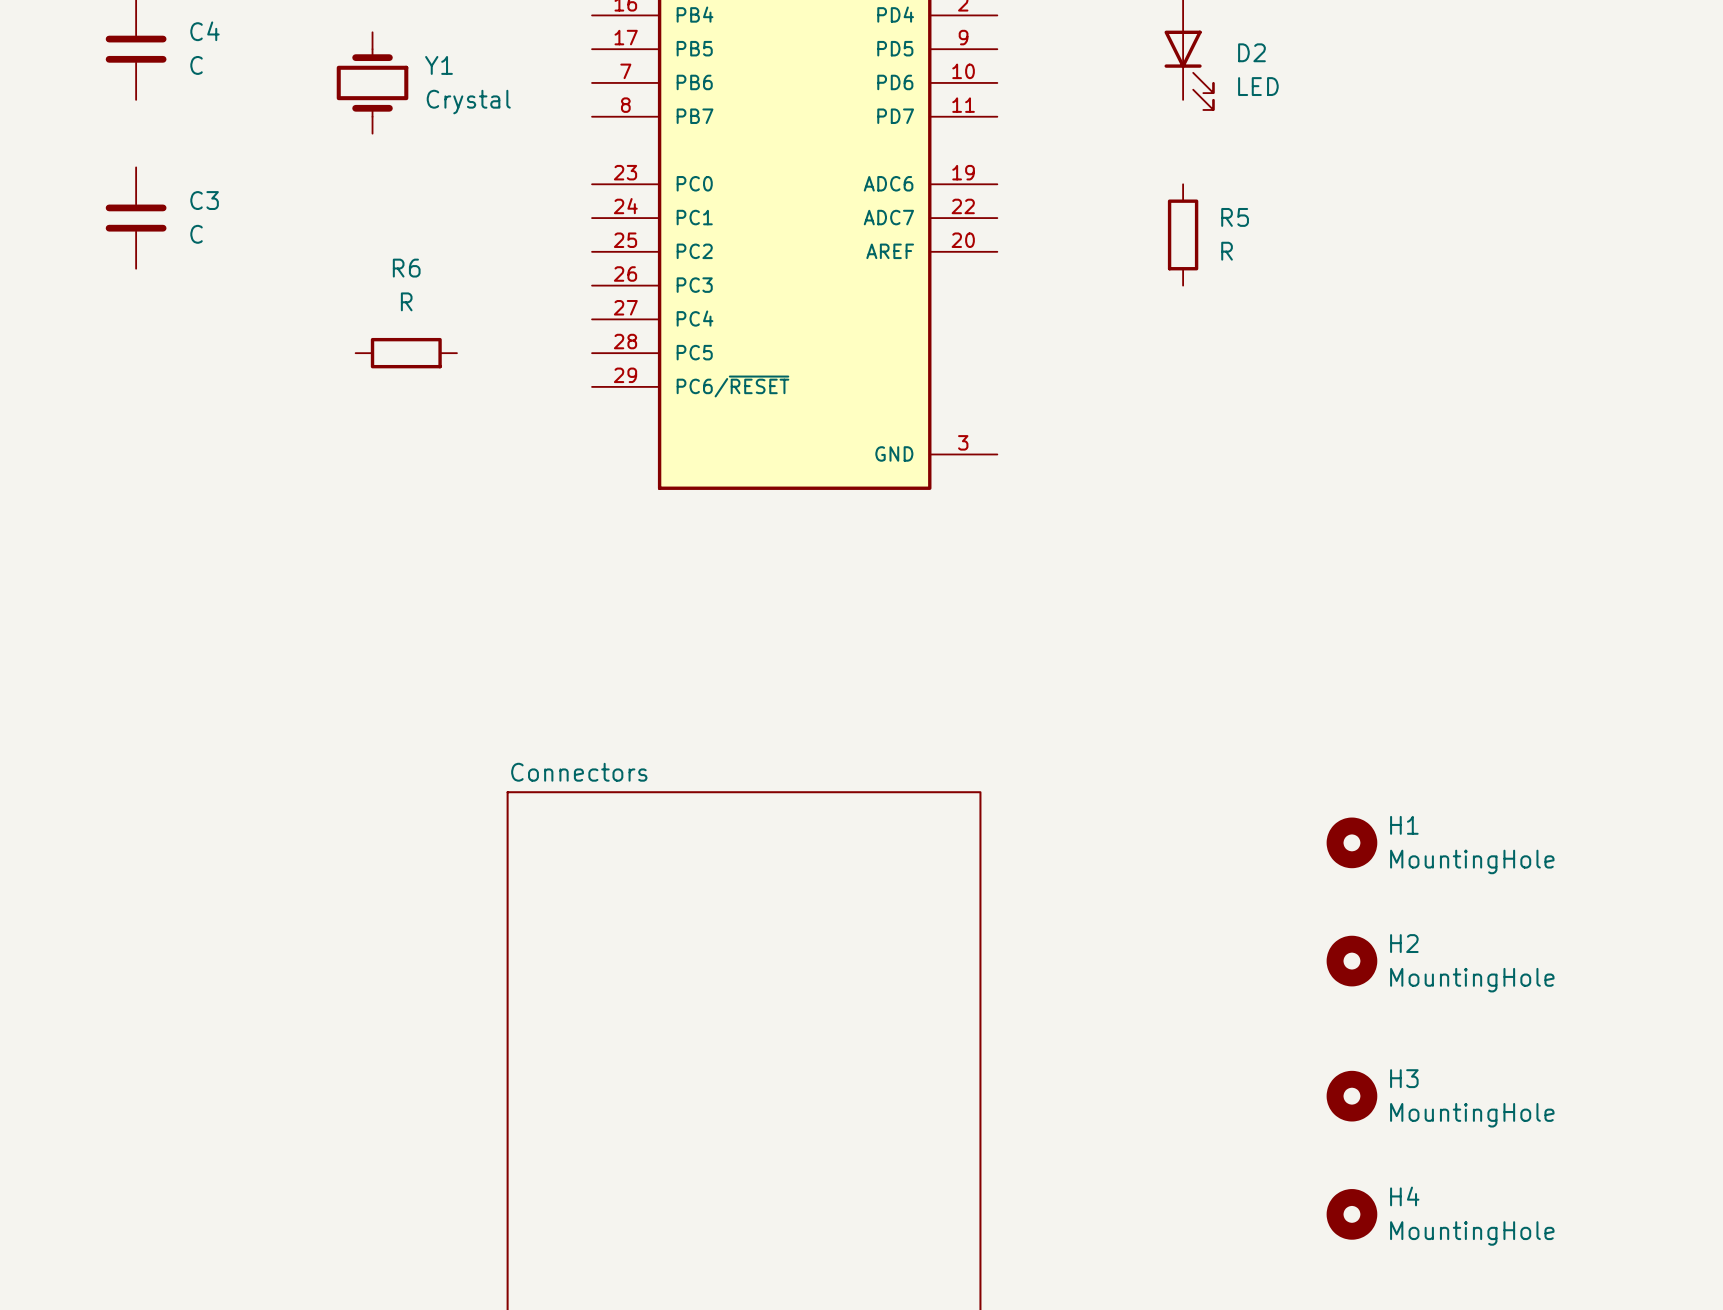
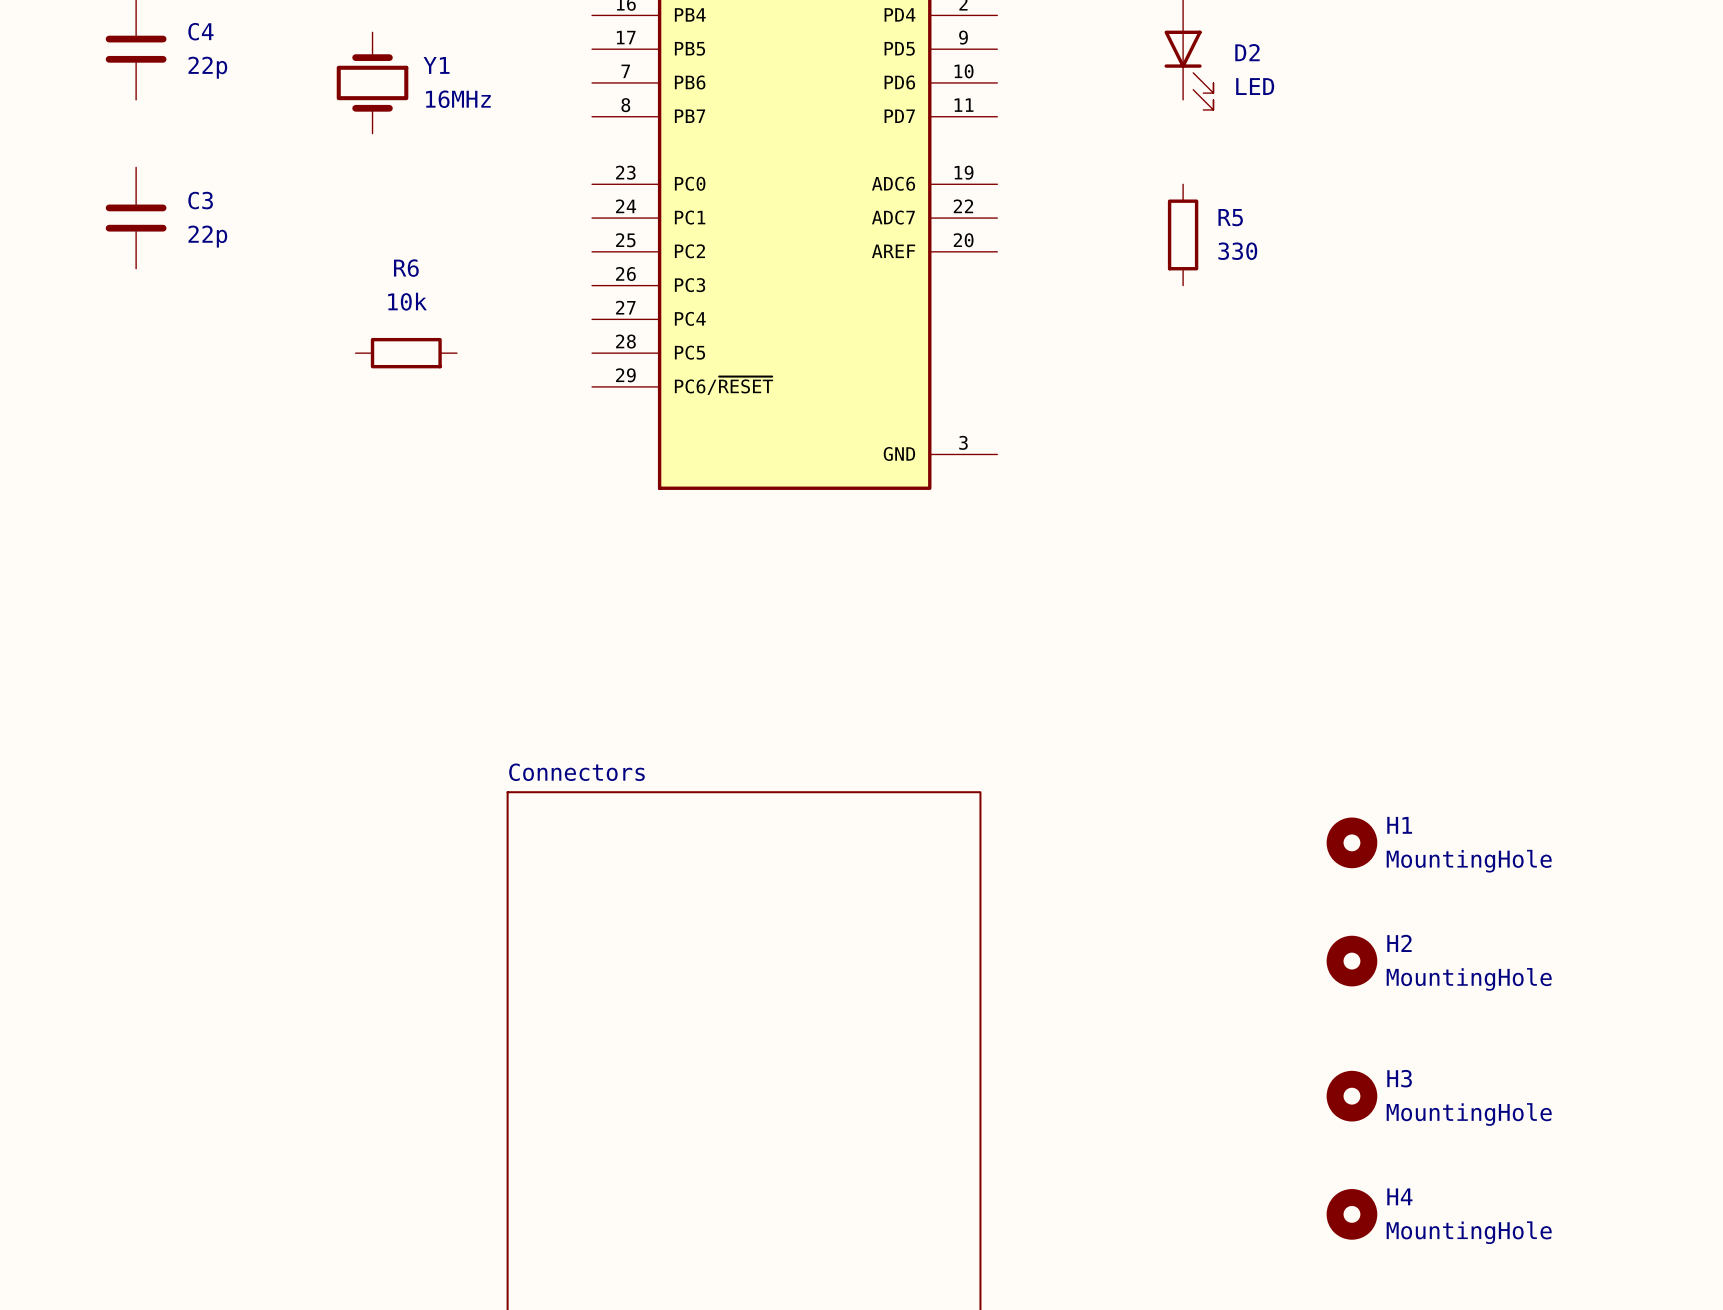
C4 value: C (196, 65) -> 22p (207, 67)
Y1 value: Crystal (468, 102) -> 16MHz (458, 99)
C3 value: C (196, 234) -> 22p (207, 236)
R5 value: R (1227, 251) -> 330 (1237, 251)
R6 value: R (406, 301) -> 10k (407, 301)

